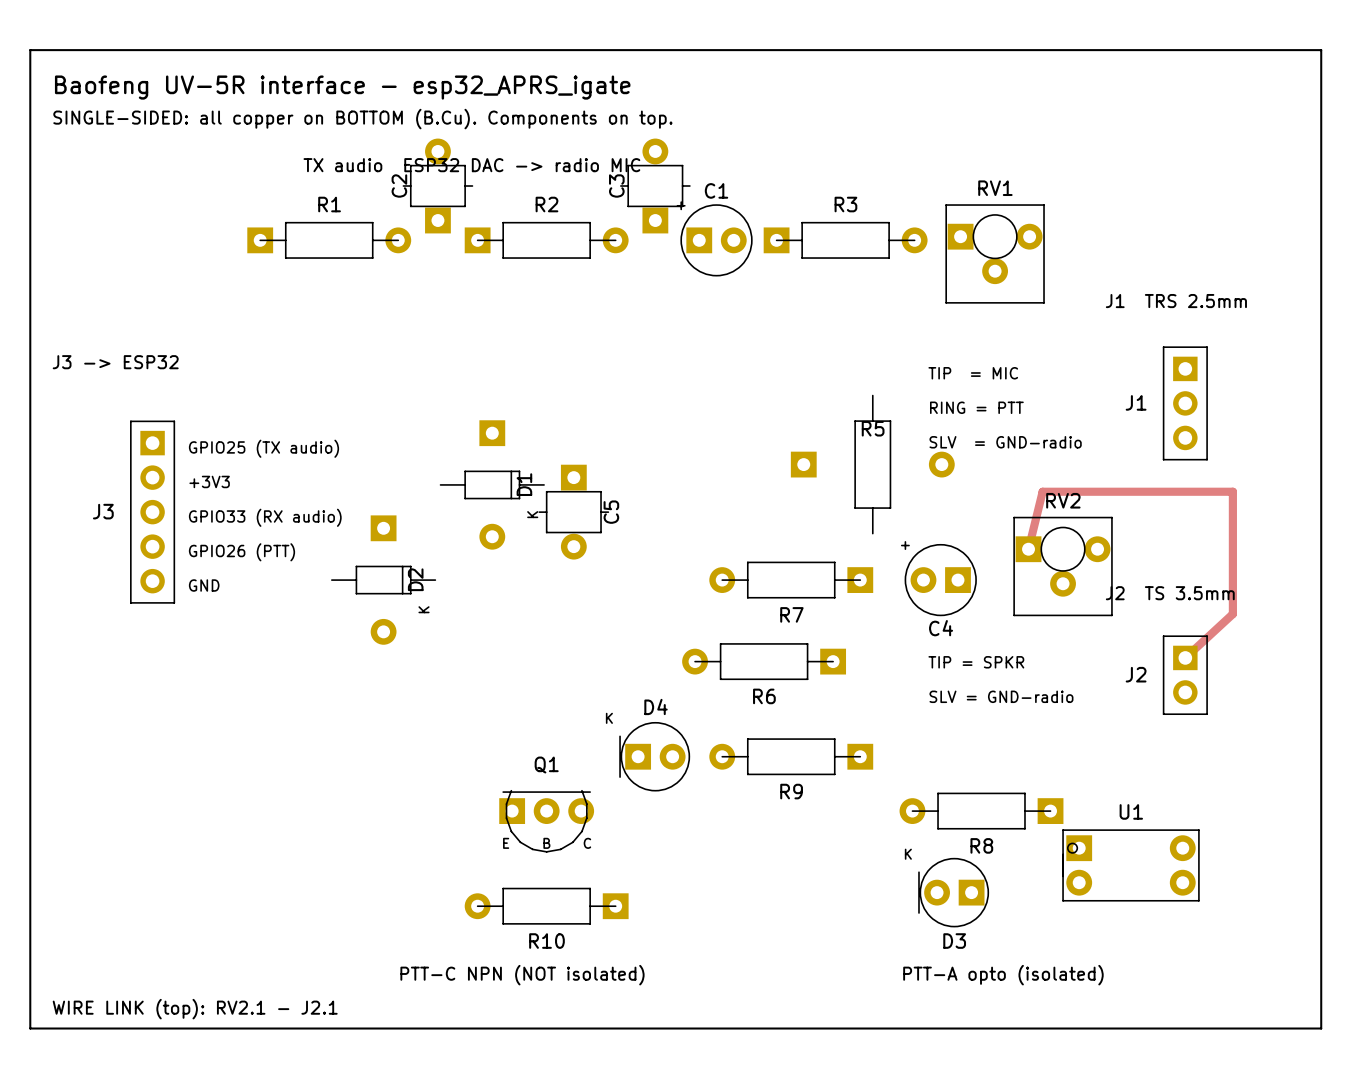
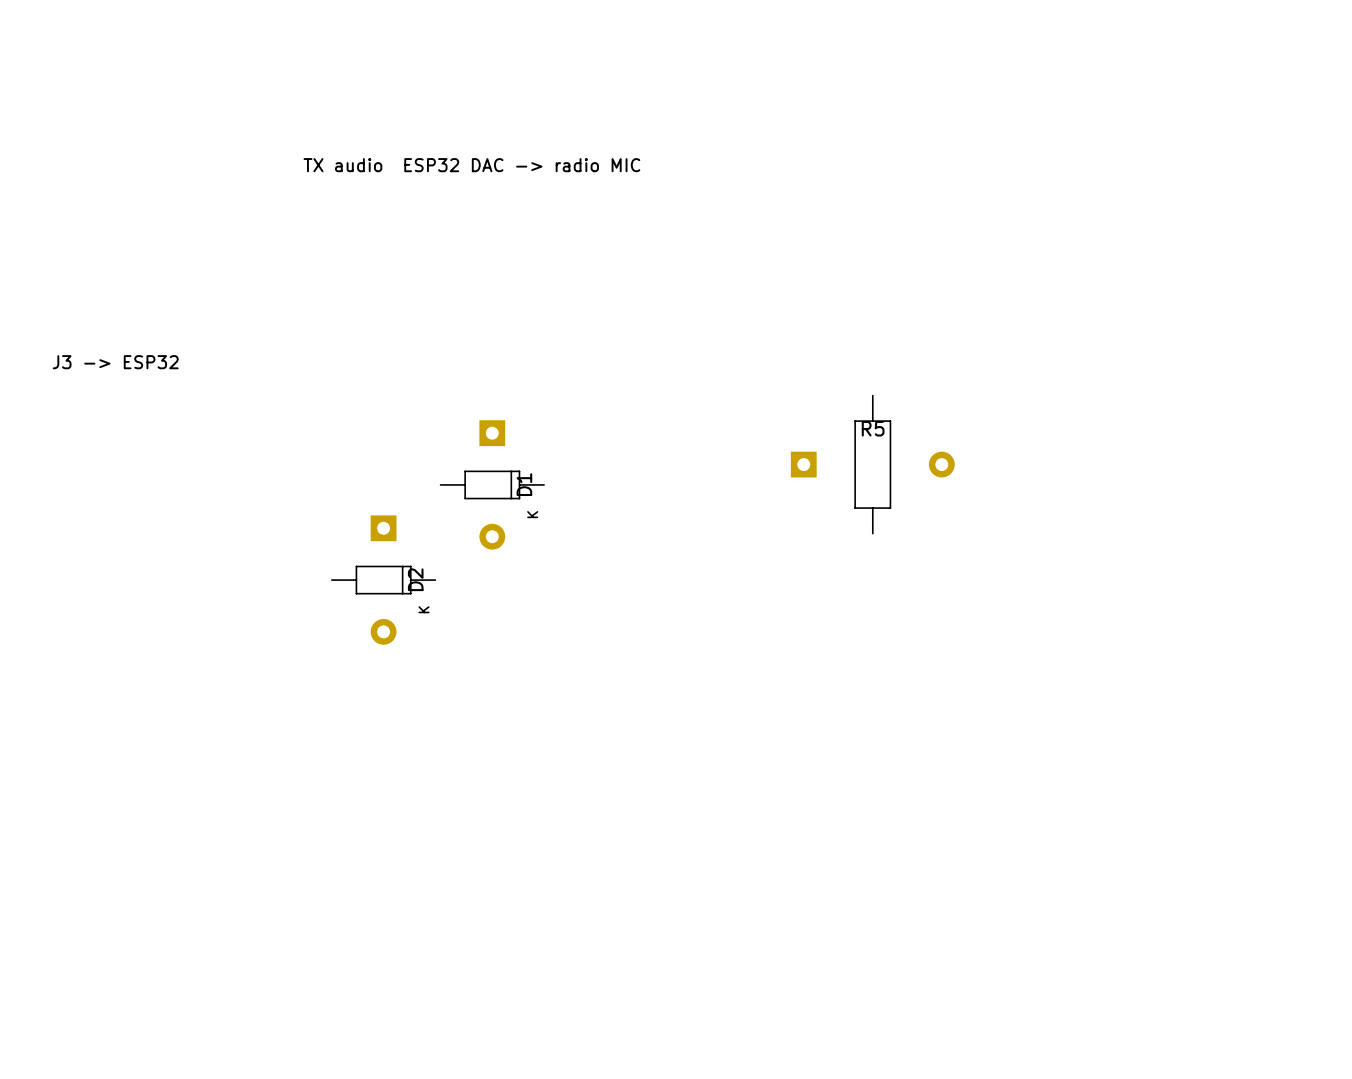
board edge: (30, 50) (1321, 50) (1321, 1028) (30, 1028) (30, 50) -> none
text: Baofeng UV-5R interface - esp32_APRS_igate (342, 87) -> none
text: SINGLE-SIDED: all copper on BOTTOM (B.Cu). Components on top. (362, 119) -> none
C2: (437, 186) -> none
C3: (655, 186) -> none
R1: (329, 240) -> none
R2: (546, 240) -> none
C1: (716, 240) -> none
R3: (845, 240) -> none
RV1: (995, 253) -> none
text: J1 TRS 2.5mm (1176, 301) -> none
text: TIP = MIC (973, 373) -> none
J1: (1185, 403) -> none
text: RING = PTT (976, 407) -> none
text: SLV = GND-radio (1005, 442) -> none
text: GPIO25 (TX audio) (263, 448) -> none
text: +3V3 (209, 481) -> none
J3: (152, 512) -> none
C5: (573, 512) -> none
text: GPIO33 (RX audio) (265, 517) -> none
track: (1028, 549) (1042, 491) (1232, 491) (1232, 614) (1185, 657) -> none
text: GPIO26 (PTT) (241, 552) -> none
RV2: (1063, 566) -> none
R7: (791, 580) -> none
C4: (940, 580) -> none
text: GND (204, 585) -> none
text: J2 TS 3.5mm (1170, 593) -> none
R6: (764, 661) -> none
text: TIP = SPKR (976, 662) -> none
J2: (1185, 675) -> none
text: SLV = GND-radio (1001, 696) -> none
D4: (654, 756) -> none
R9: (791, 756) -> none
R8: (981, 811) -> none
Q1: (546, 821) -> none
U1: (1130, 865) -> none
D3: (953, 892) -> none
R10: (546, 906) -> none
text: PTT-C NPN (NOT isolated) (522, 975) -> none
text: PTT-A opto (isolated) (1003, 975) -> none
text: WIRE LINK (top): RV2.1 - J2.1 (195, 1009) -> none

